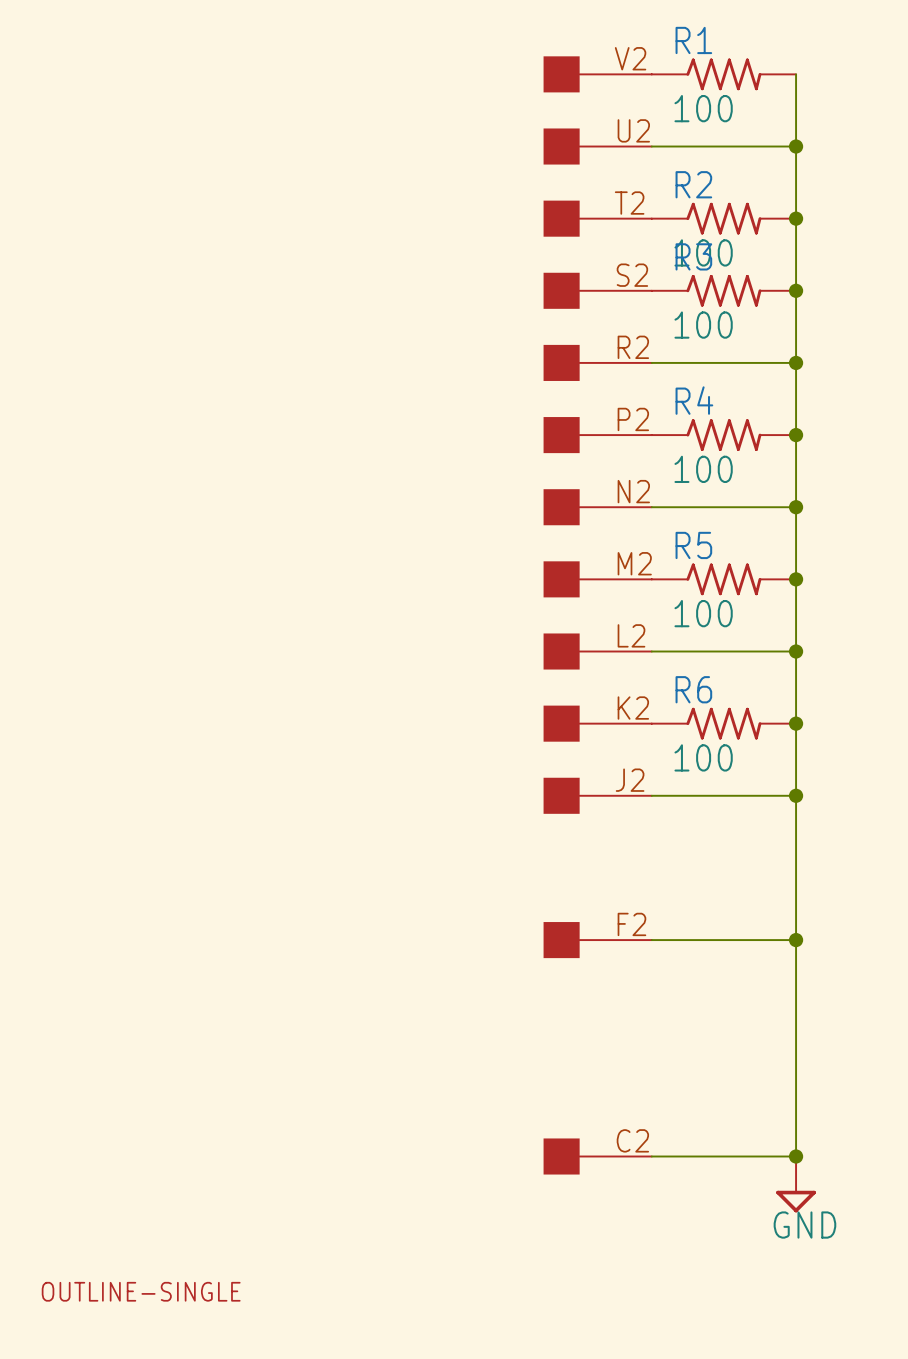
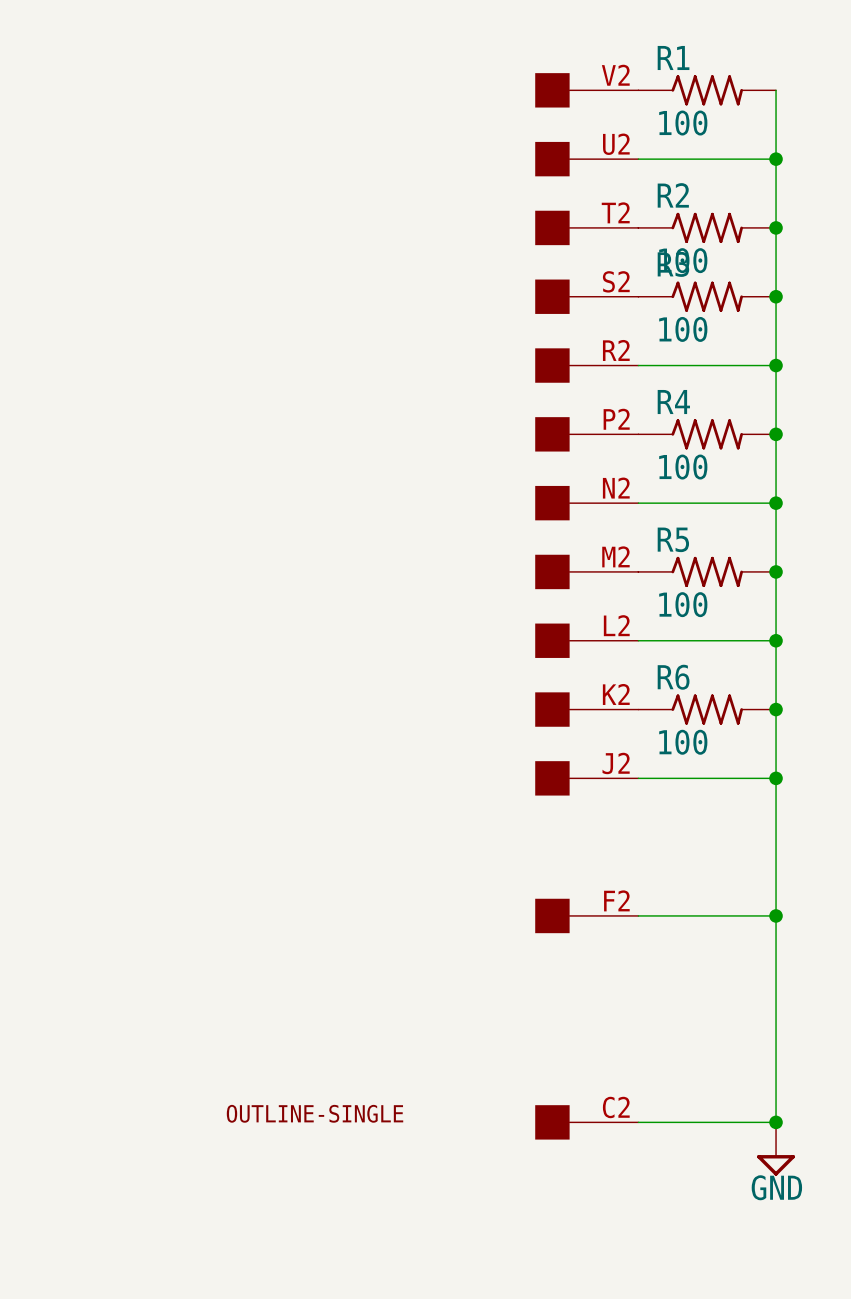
part position: (141, 1291) -> (315, 1113)

